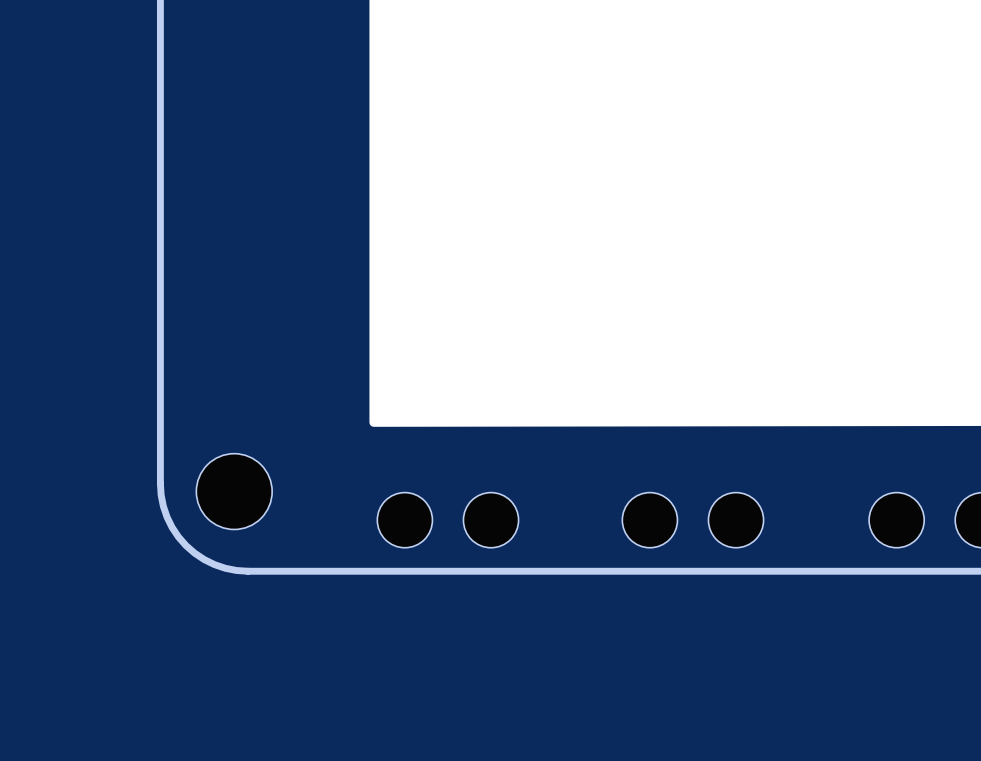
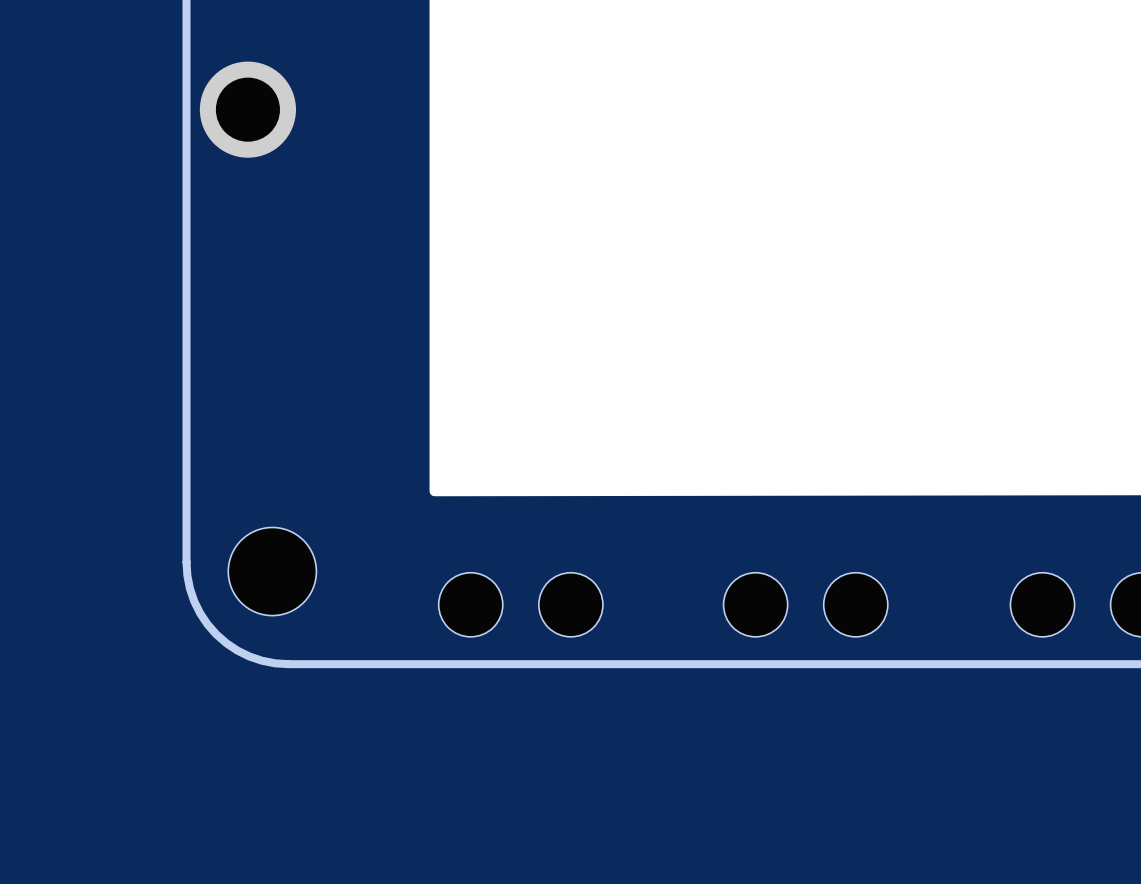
part: none -> (247, 109)

